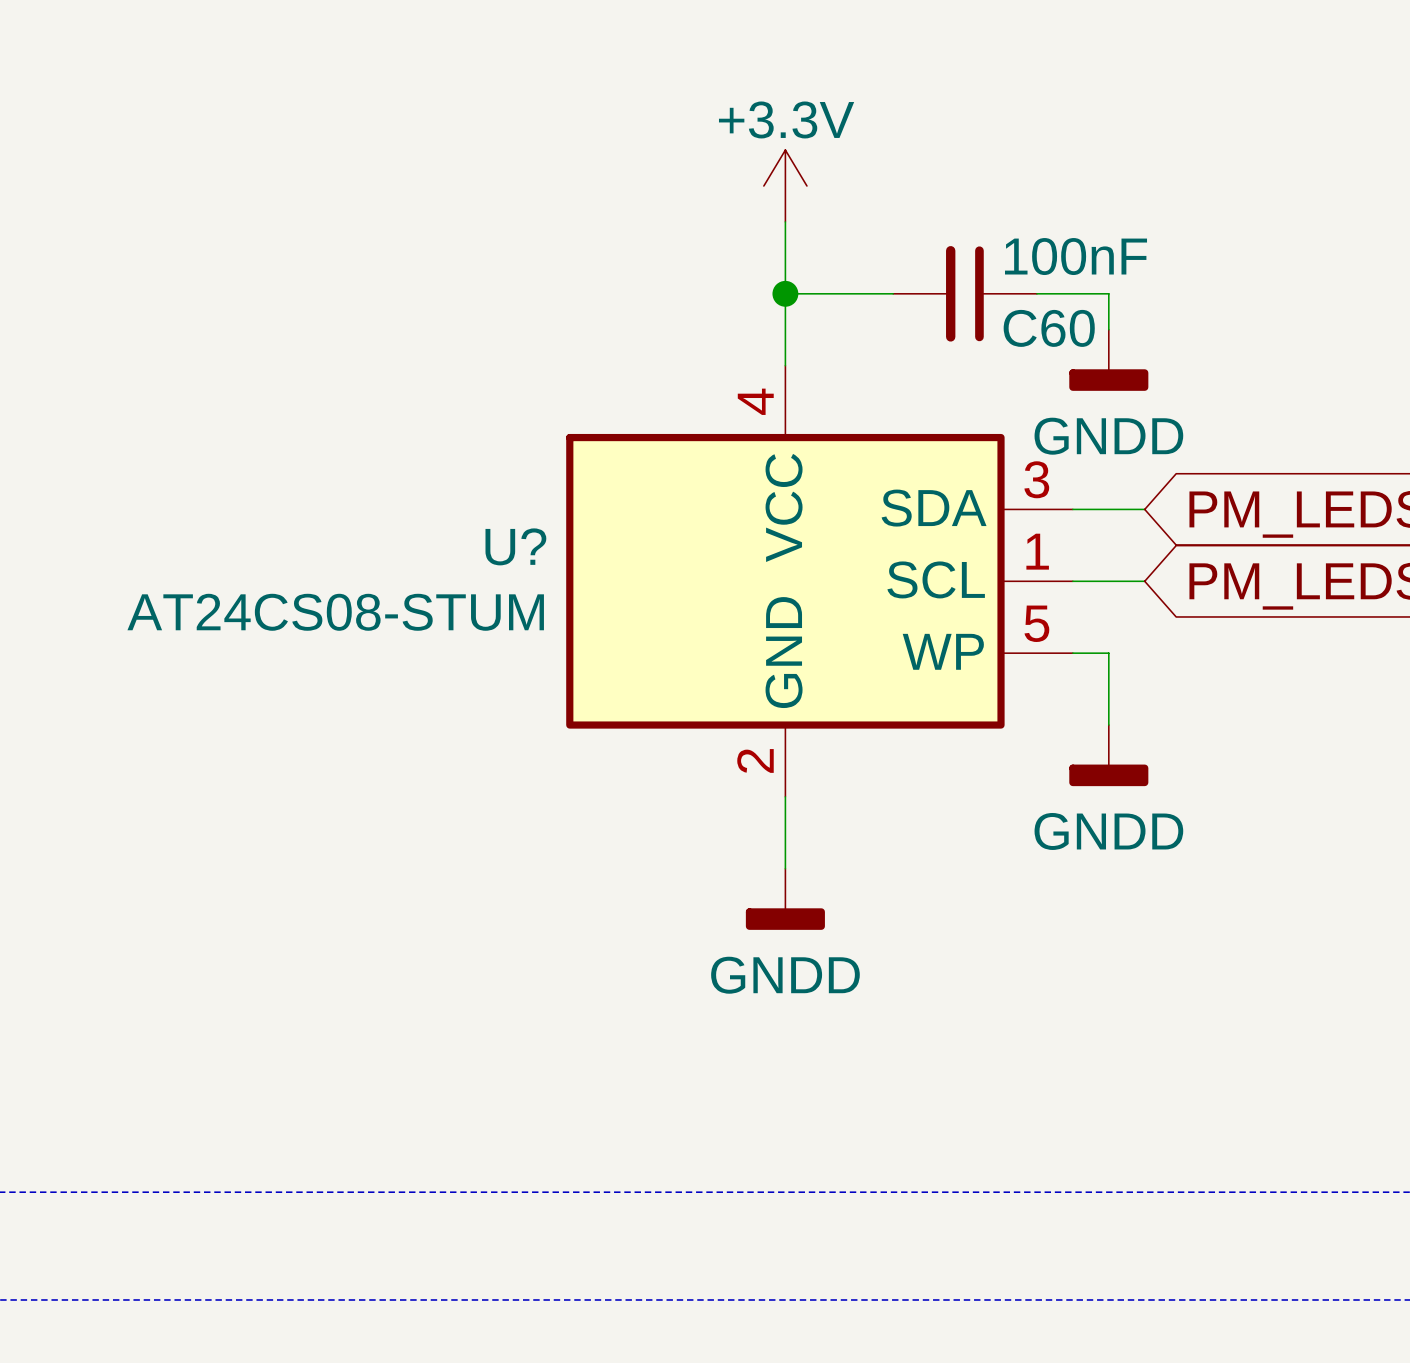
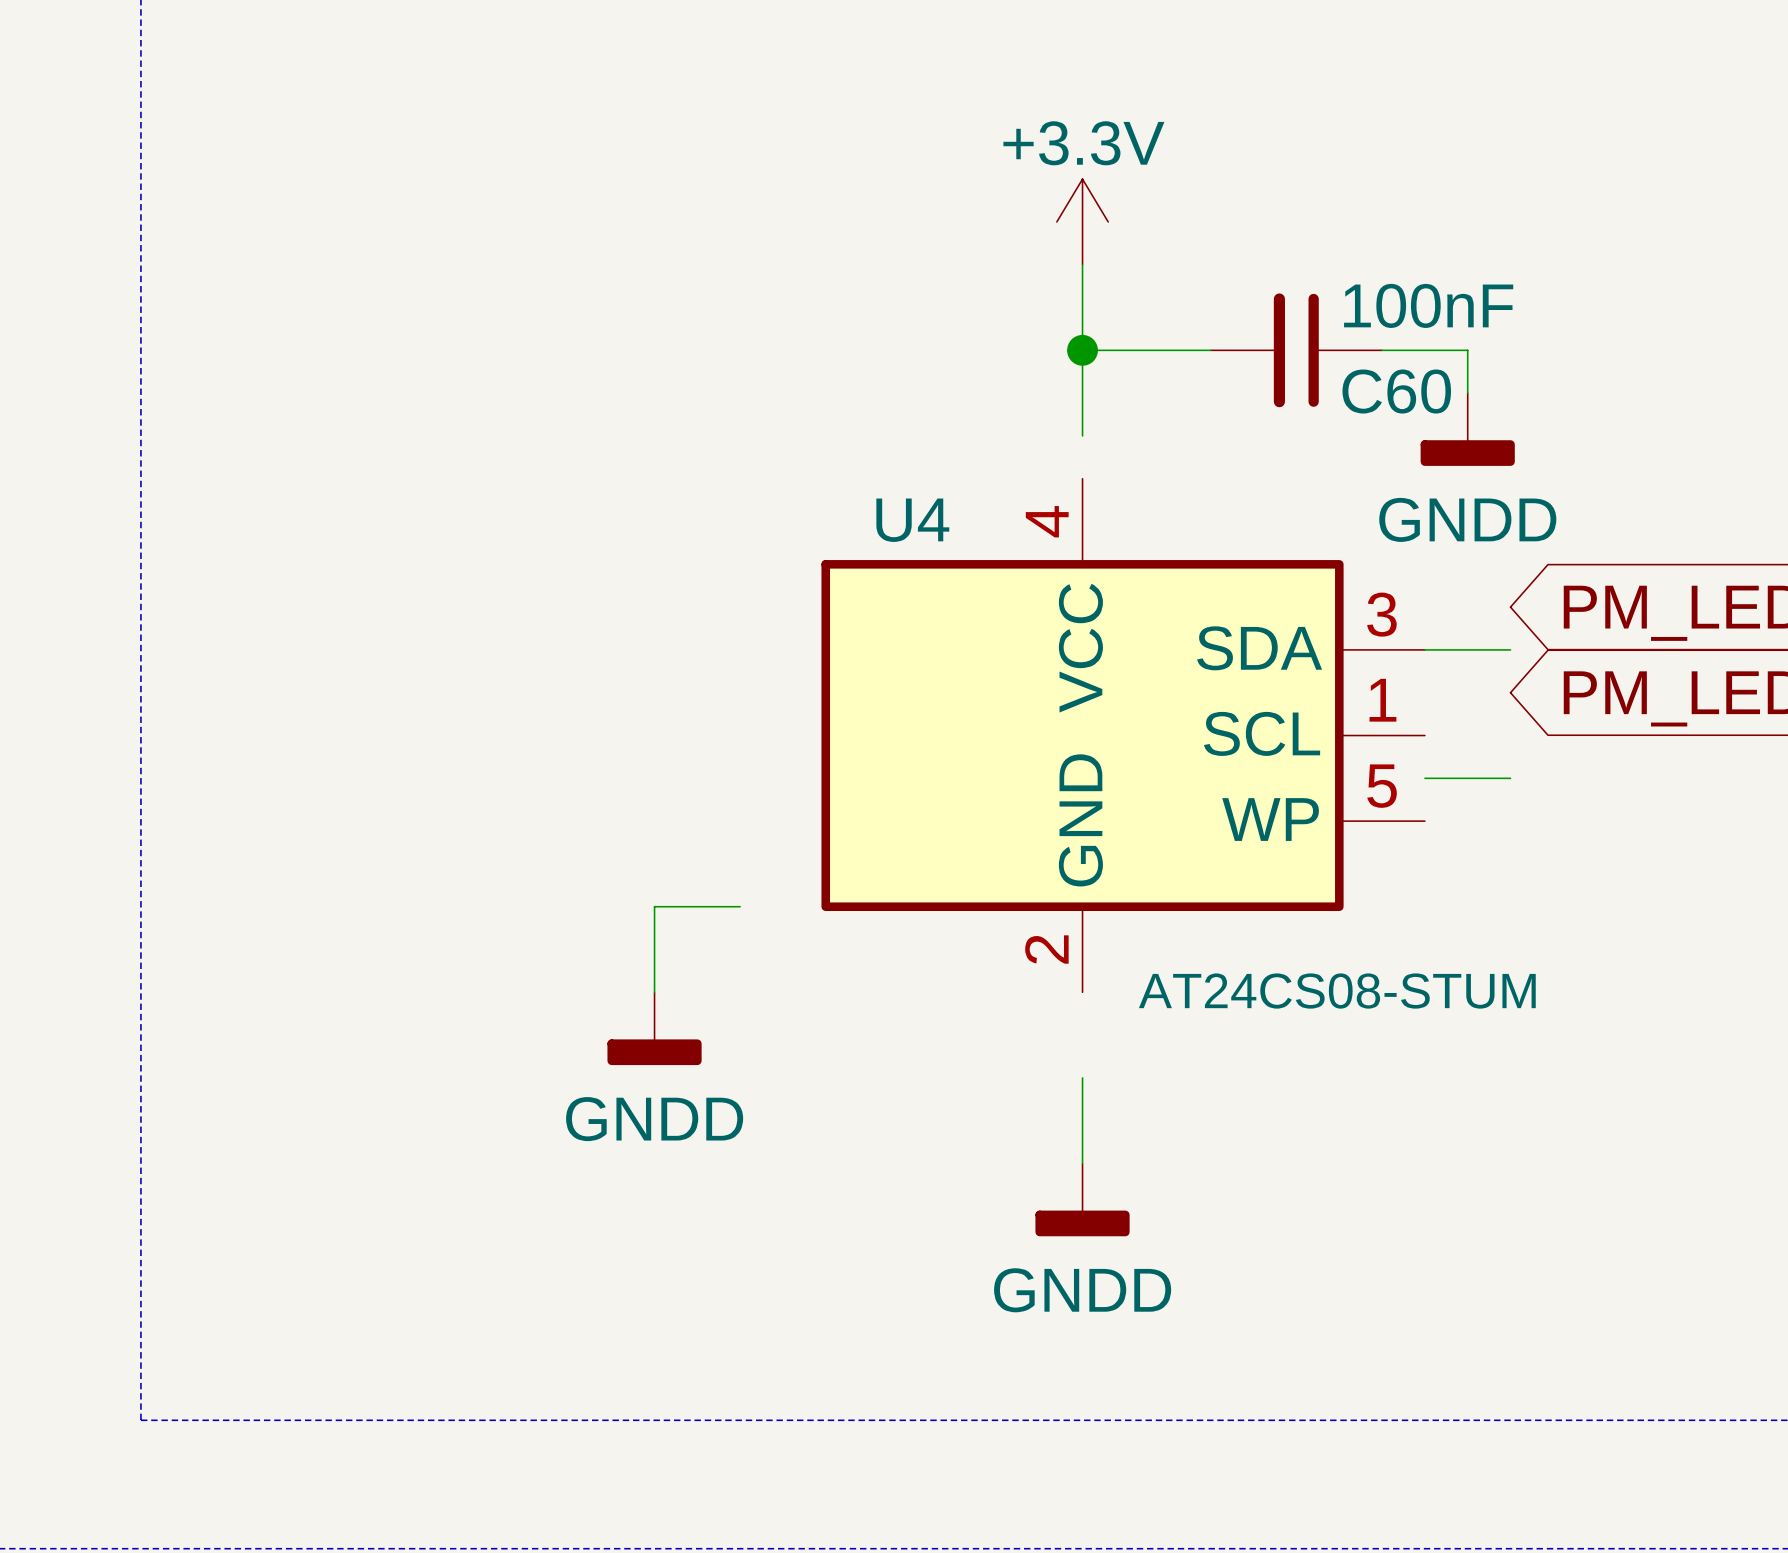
wire: (1072, 509) (1144, 509) -> (1424, 649) (1510, 649)
U?: AT24CS08-STUM (819, 581) -> none
wire: (1072, 581) (1144, 581) -> none
U4: none -> AT24CS08-STUM (1123, 735)
wire: (1108, 653) (1108, 725) -> (1467, 778) (1510, 778)
power symbol: GNDD (1108, 755) -> none
wire: none -> (740, 906) (654, 906) (654, 992)
wire: (785, 796) (785, 868) -> (1082, 1077) (1082, 1163)
power symbol: none -> GNDD (654, 1028)
power symbol position: GNDD (785, 899) -> GNDD (1082, 1199)

